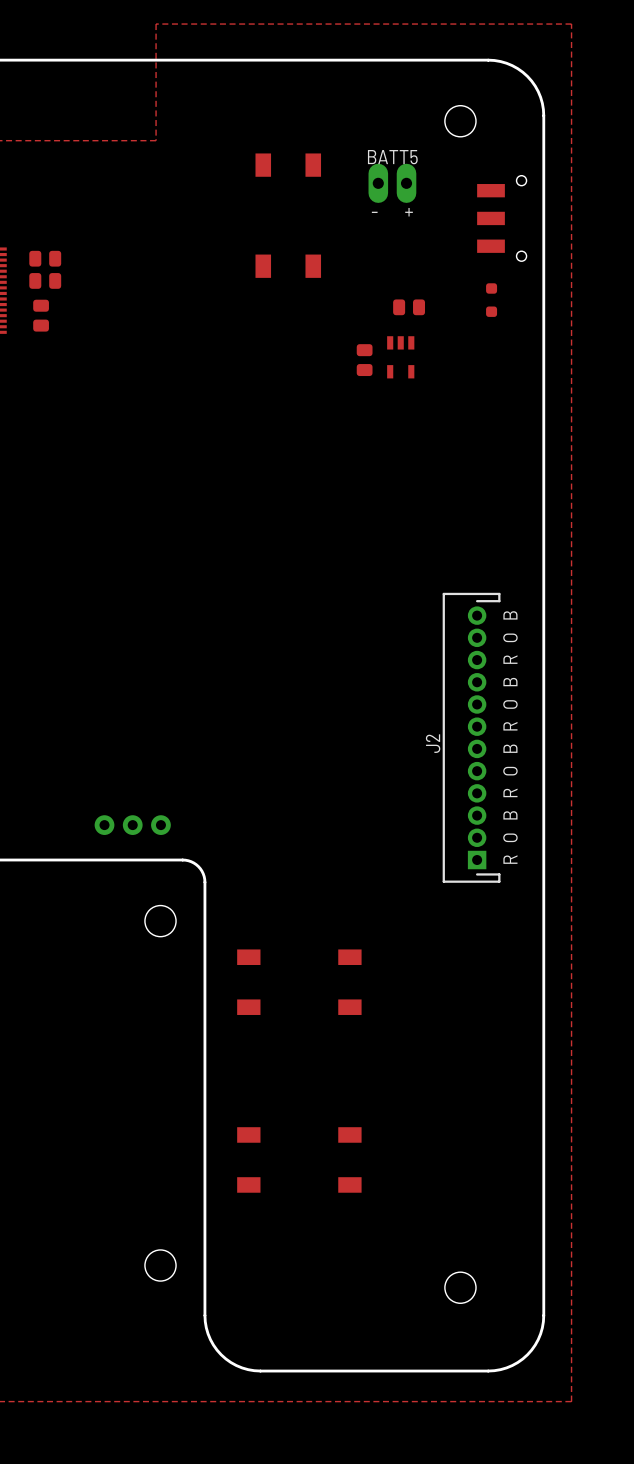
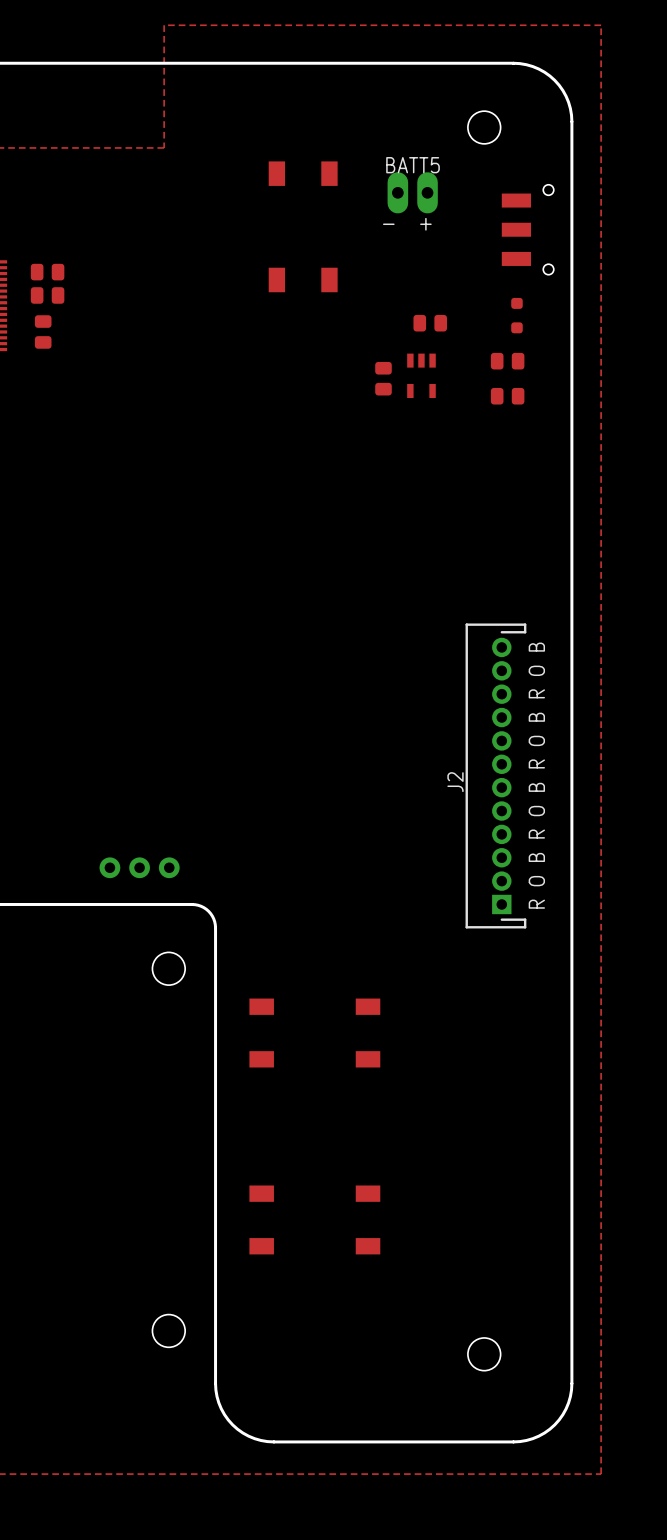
part: none -> (507, 361)
part: none -> (507, 396)

